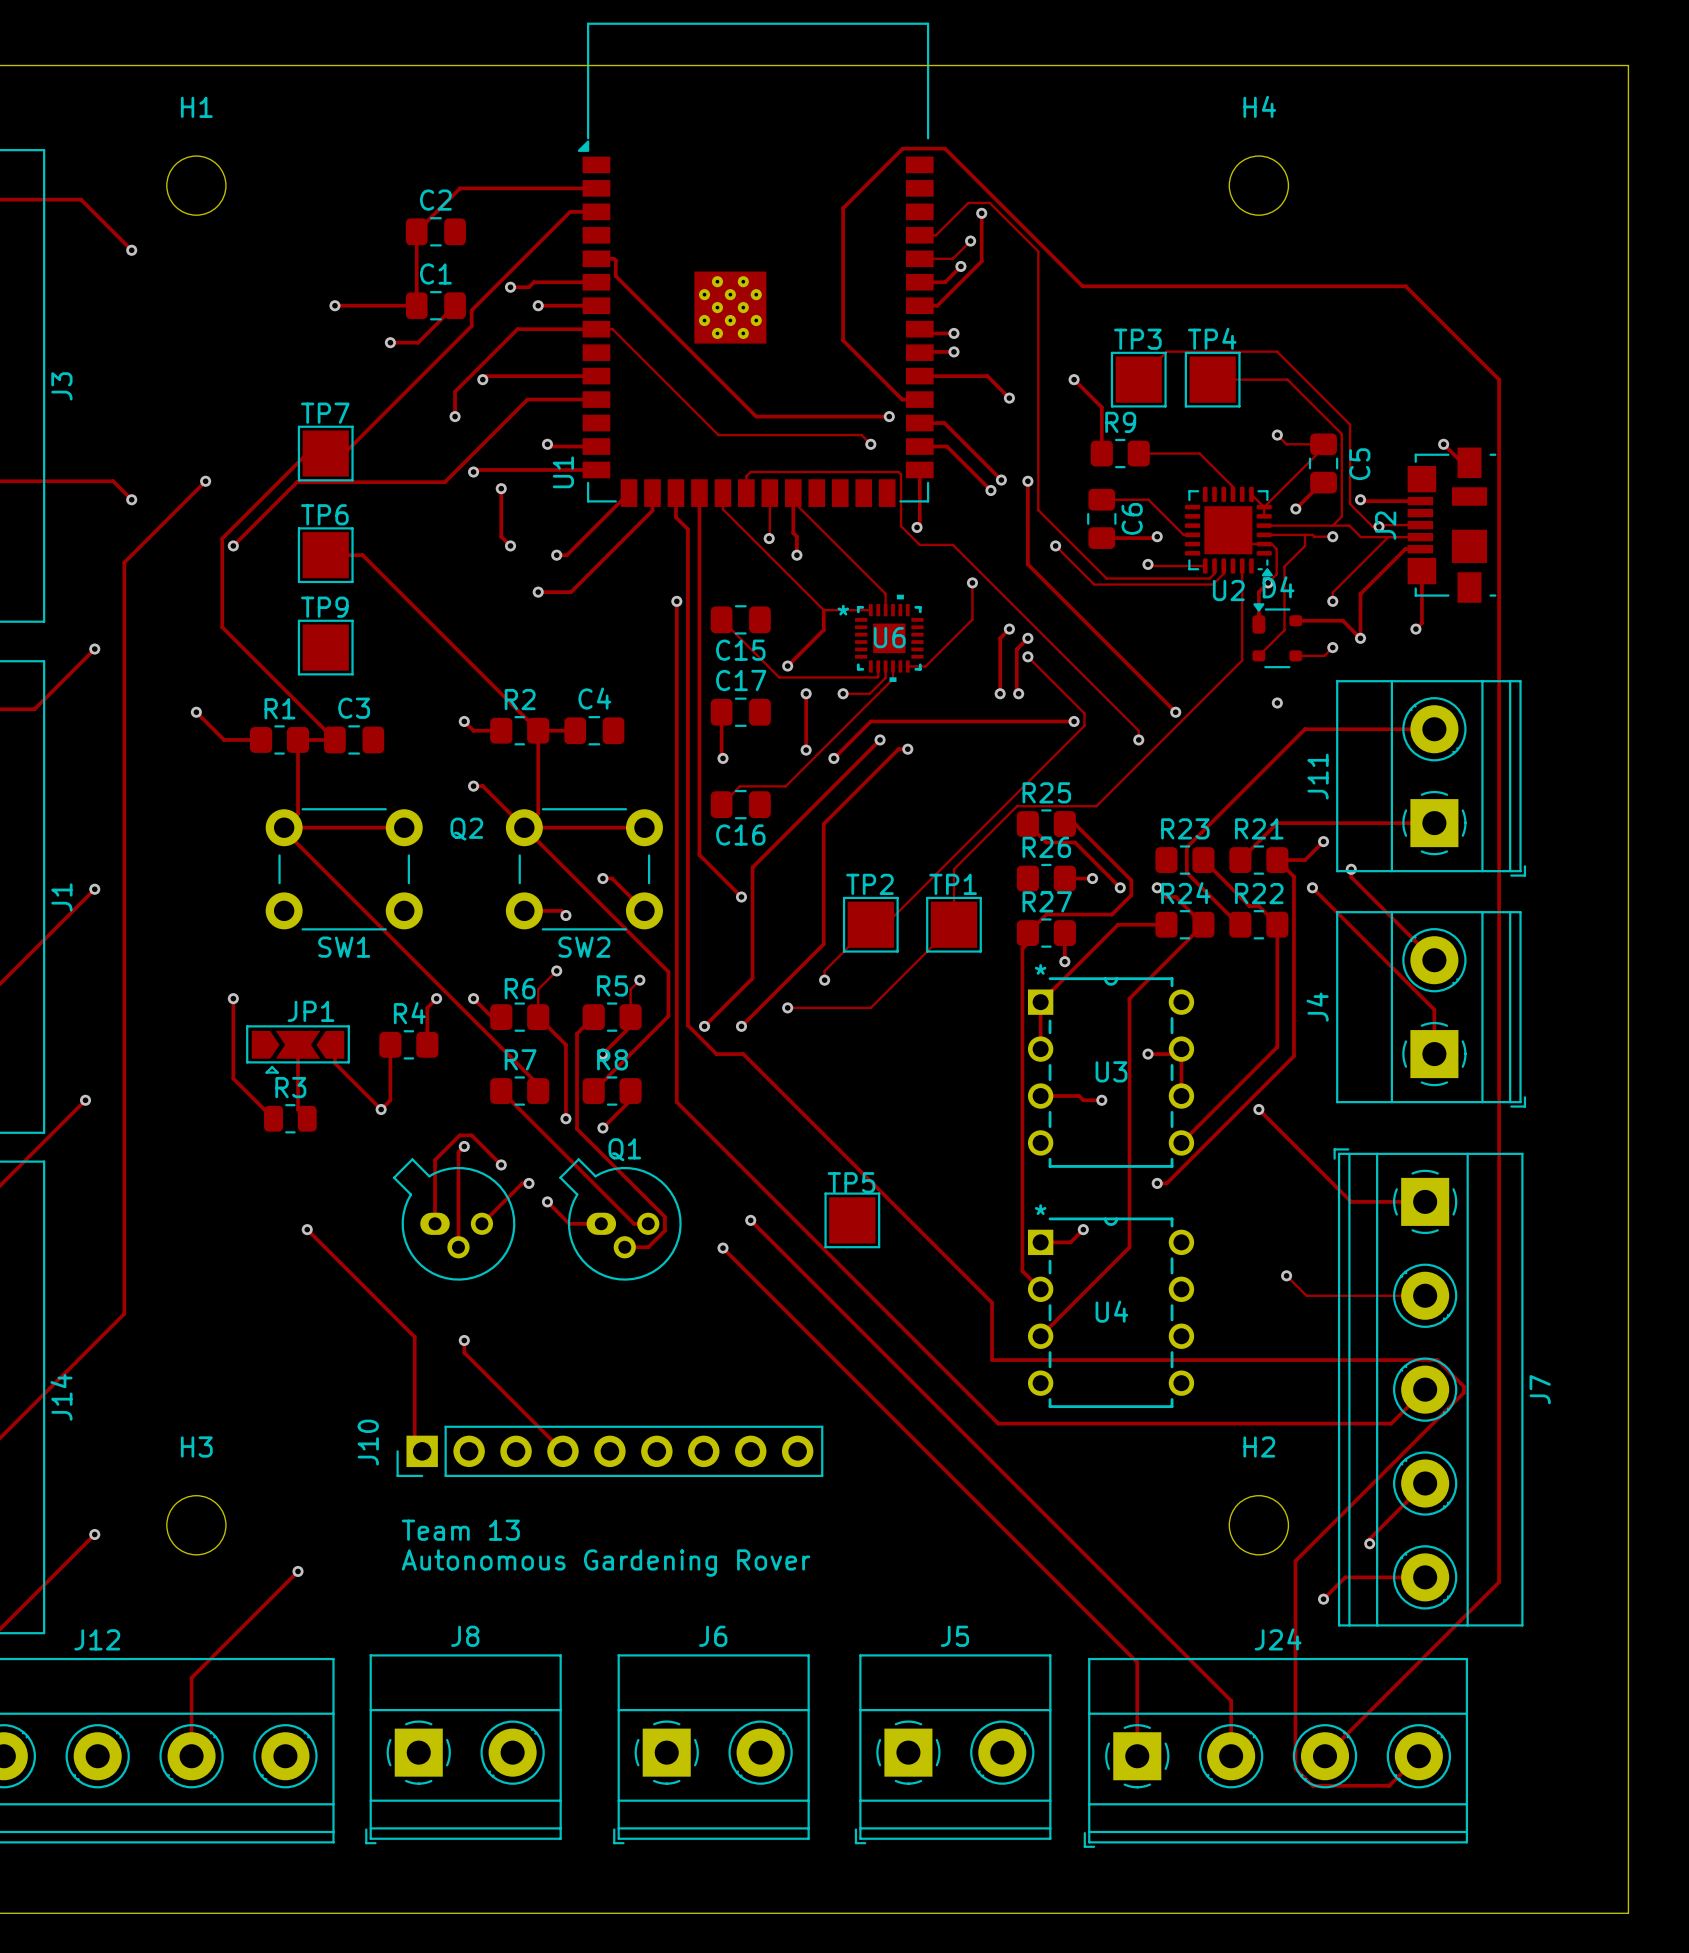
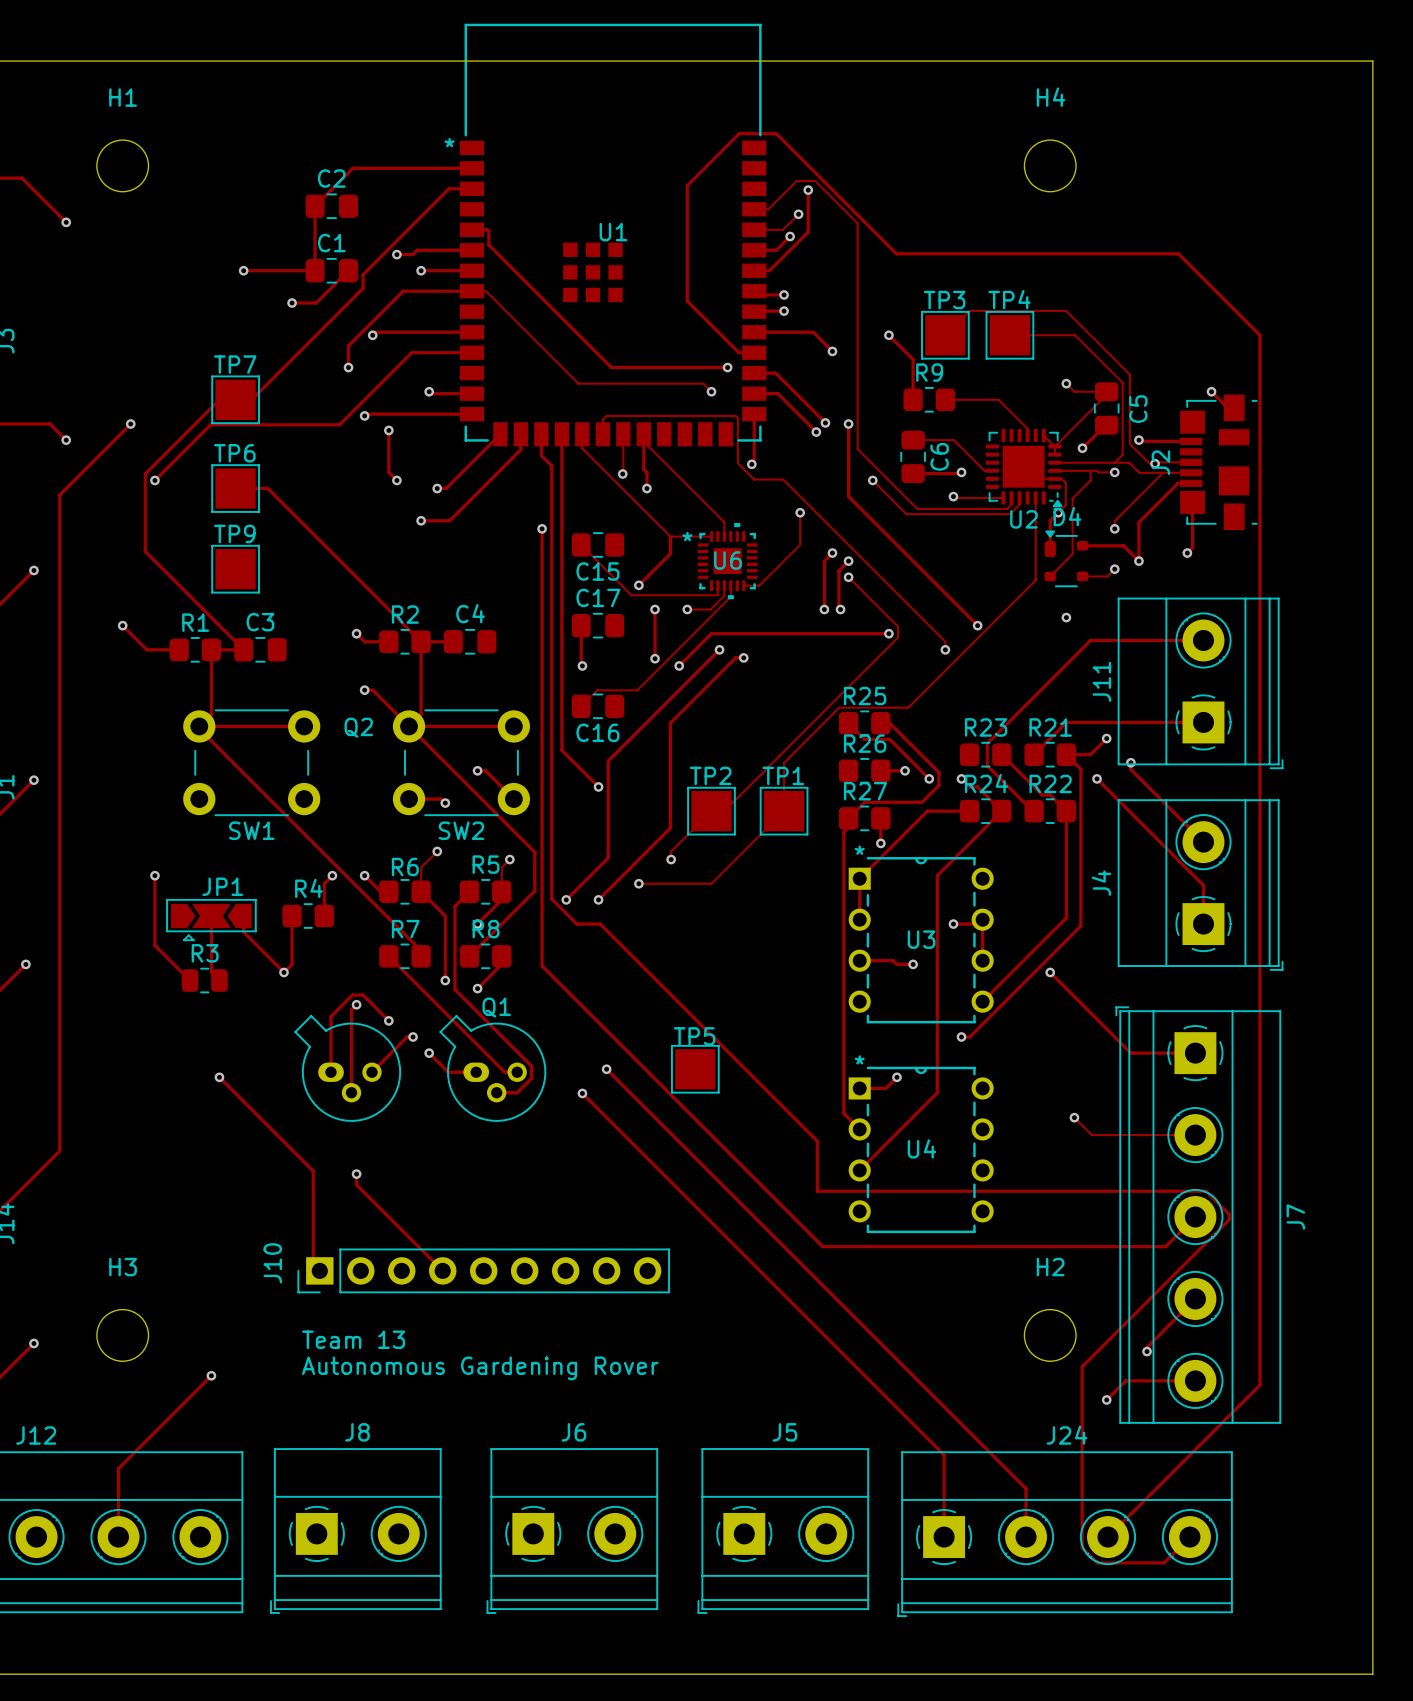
U1 footprint: [577, 22, 934, 507] -> [459, 23, 767, 447]
U1 name position: U1 (563, 472) -> U1 (613, 232)

